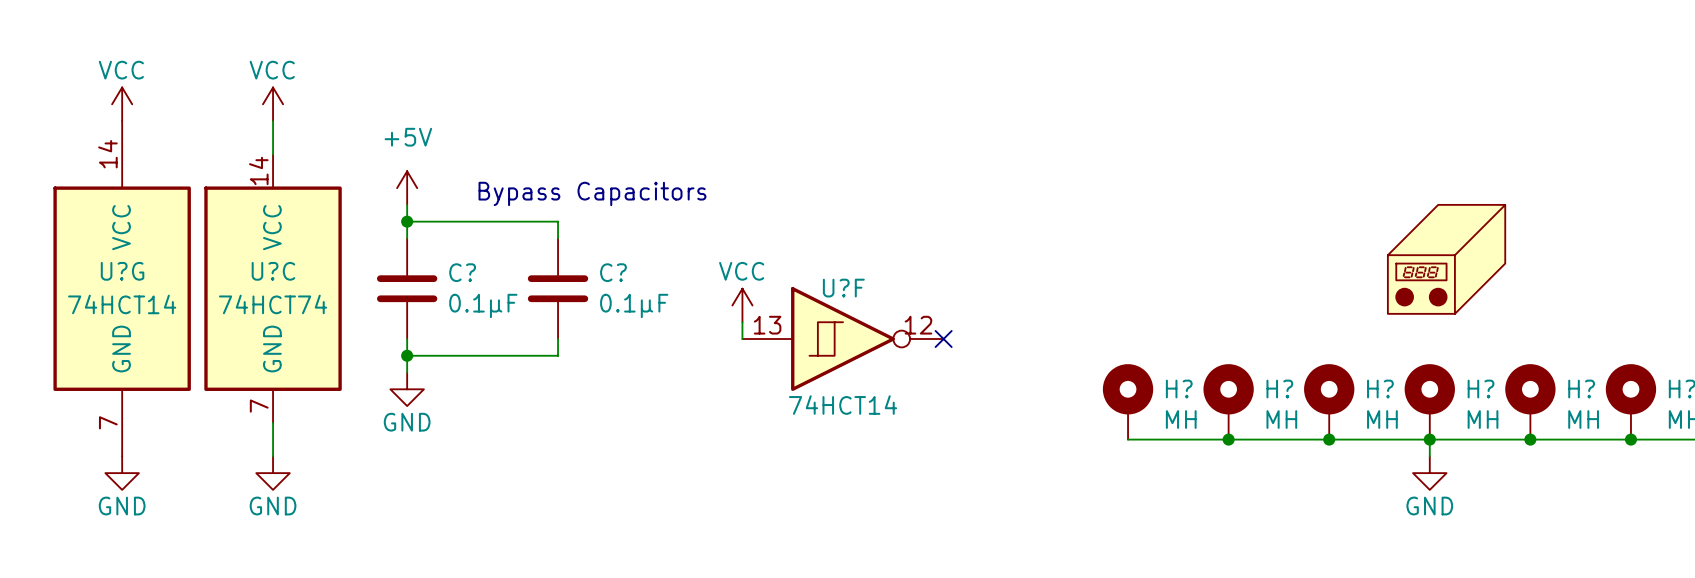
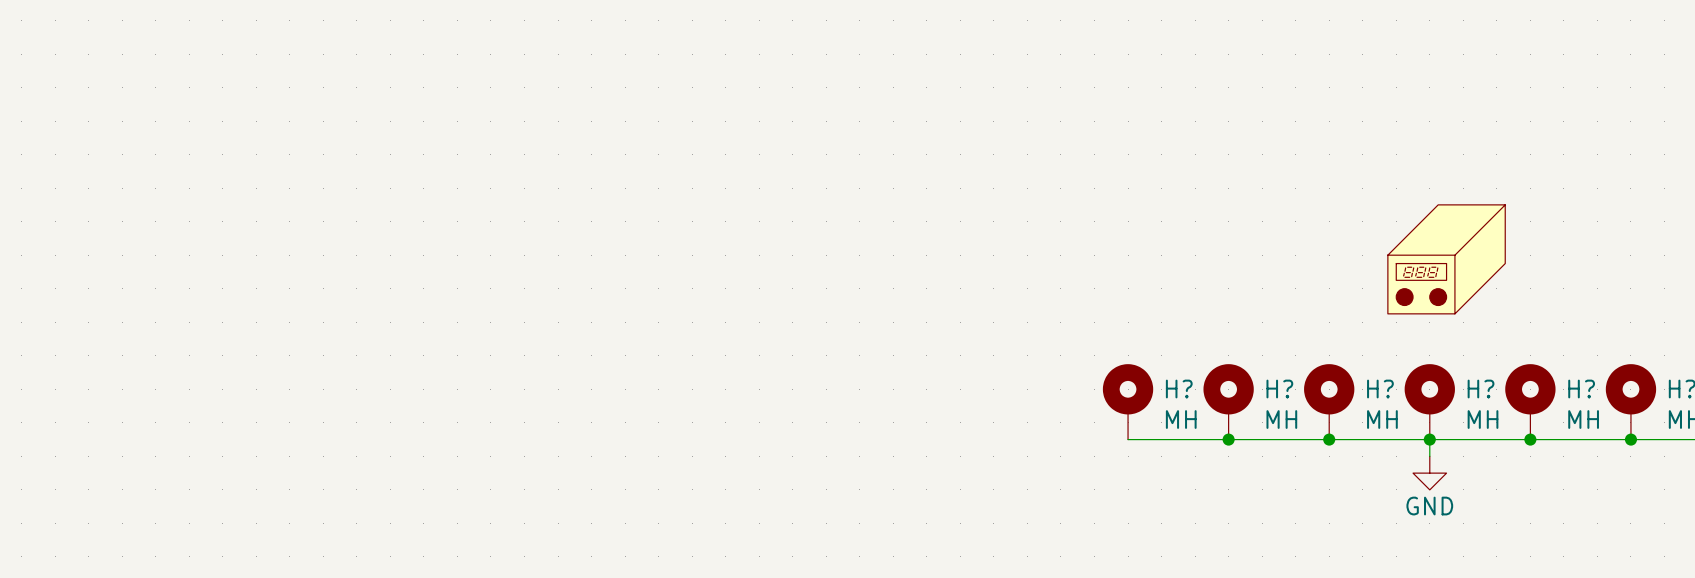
power symbol: VCC (122, 104) -> none
power symbol: VCC (273, 104) -> none
wire: (273, 121) (273, 154) -> none
power symbol: +5V (407, 188) -> none
text: Bypass Capacitors (592, 193) -> none
wire: (407, 204) (407, 238) -> none
wire: (407, 221) (558, 221) (558, 238) -> none
junction: (407, 221) -> none
U?G: 74HCT14 (122, 288) -> none
U?C: 74HCT74 (273, 288) -> none
C?: 0.1µF (407, 288) -> none
C?: 0.1µF (558, 288) -> none
power symbol: VCC (742, 305) -> none
wire: (742, 322) (742, 339) -> none
wire: (407, 339) (407, 372) -> none
wire: (558, 339) (558, 355) (407, 355) -> none
U?F: 74HCT14 (843, 339) -> none
no-connect mark: (943, 339) -> none
junction: (407, 355) -> none
power symbol: GND (407, 389) -> none
wire: (273, 422) (273, 456) -> none
power symbol: GND (122, 473) -> none
power symbol: GND (273, 473) -> none

